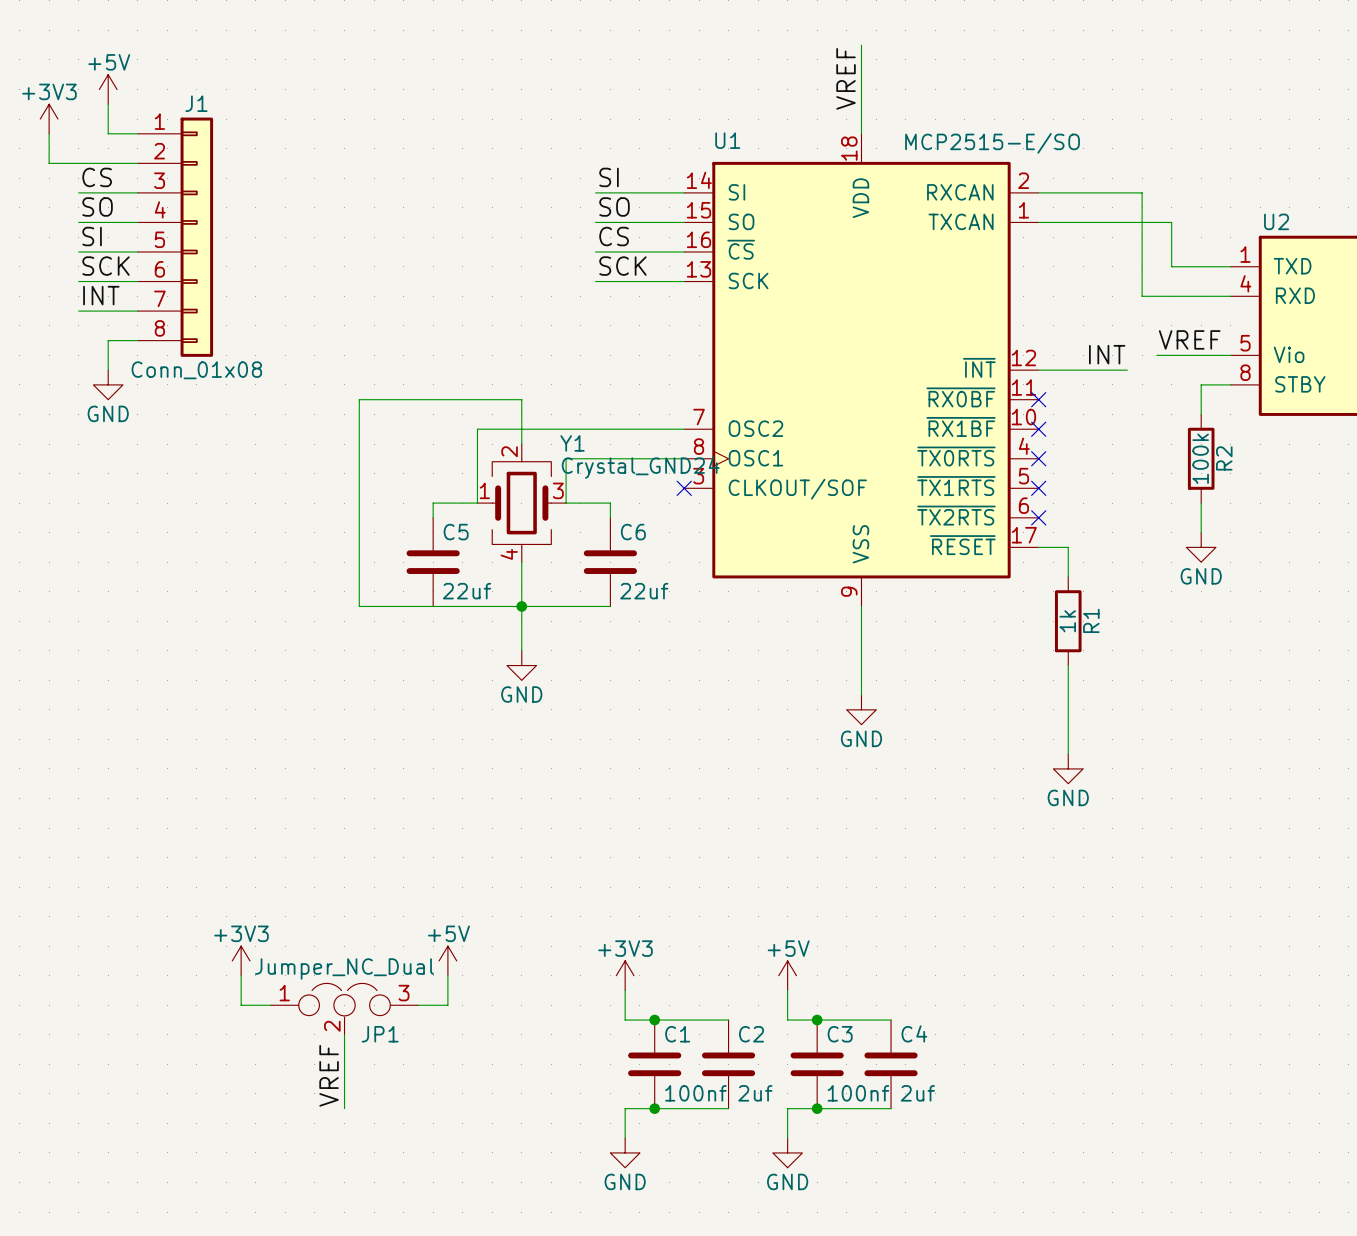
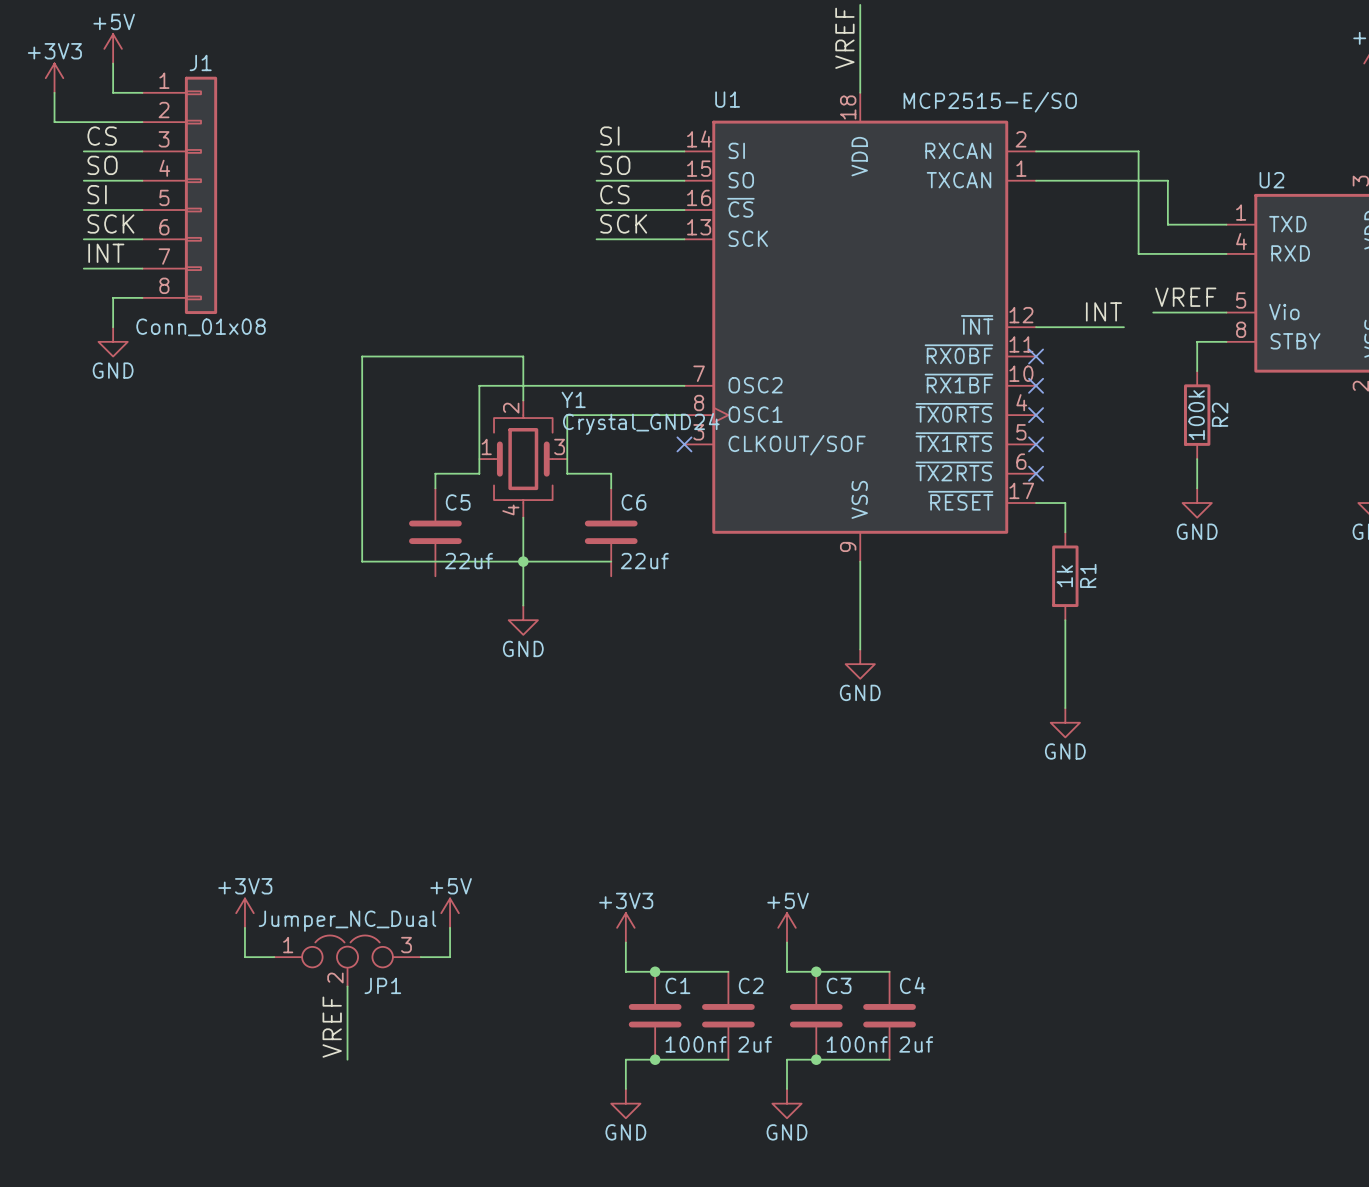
wire: (477, 503) (433, 503) (433, 517) -> (479, 459) (479, 473) (435, 473) (435, 488)
wire: (566, 503) (610, 503) (610, 517) -> (567, 459) (567, 473) (611, 473) (611, 488)
C5 position: (433, 562) -> (435, 532)
C6 position: (610, 562) -> (611, 532)

